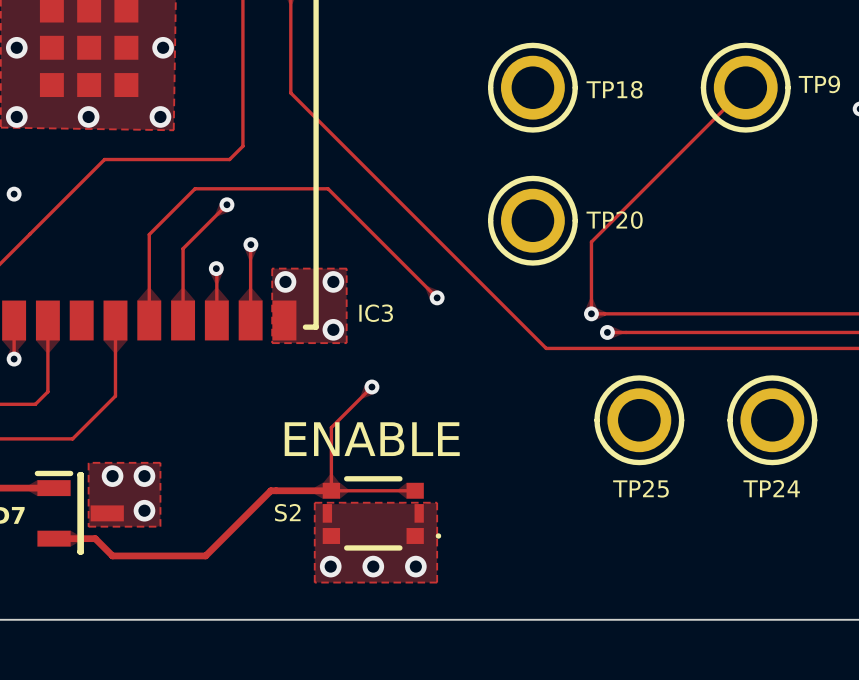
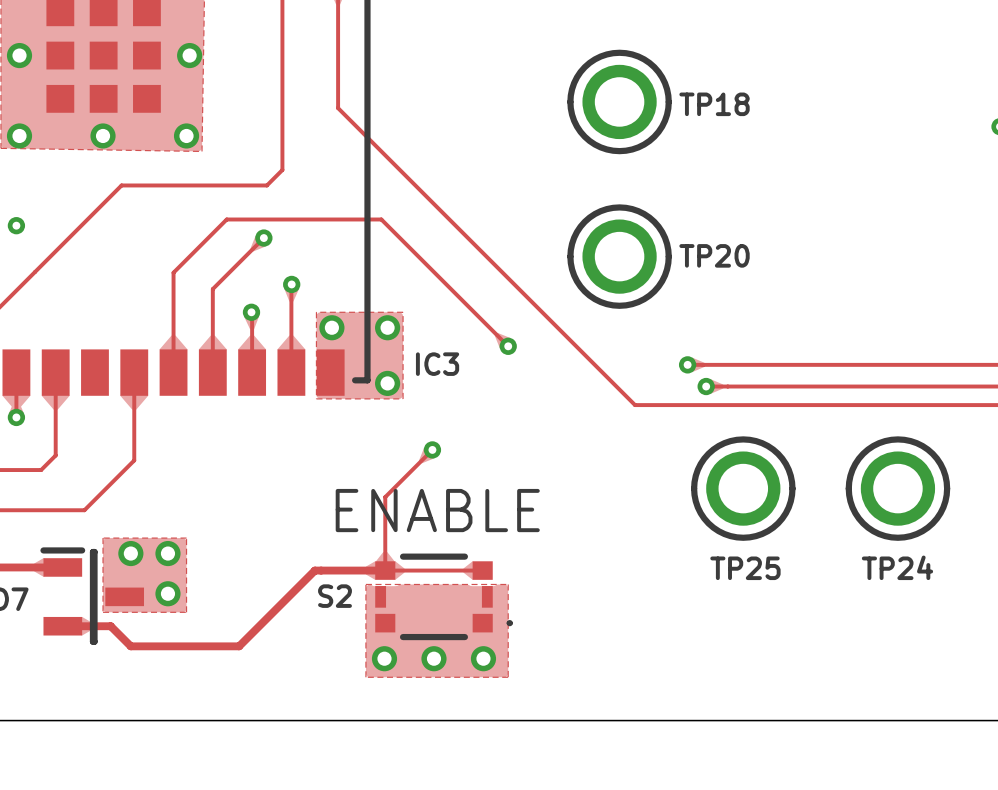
track: (745, 87) (591, 242) (591, 313) -> none
TP9: (745, 87) -> none

